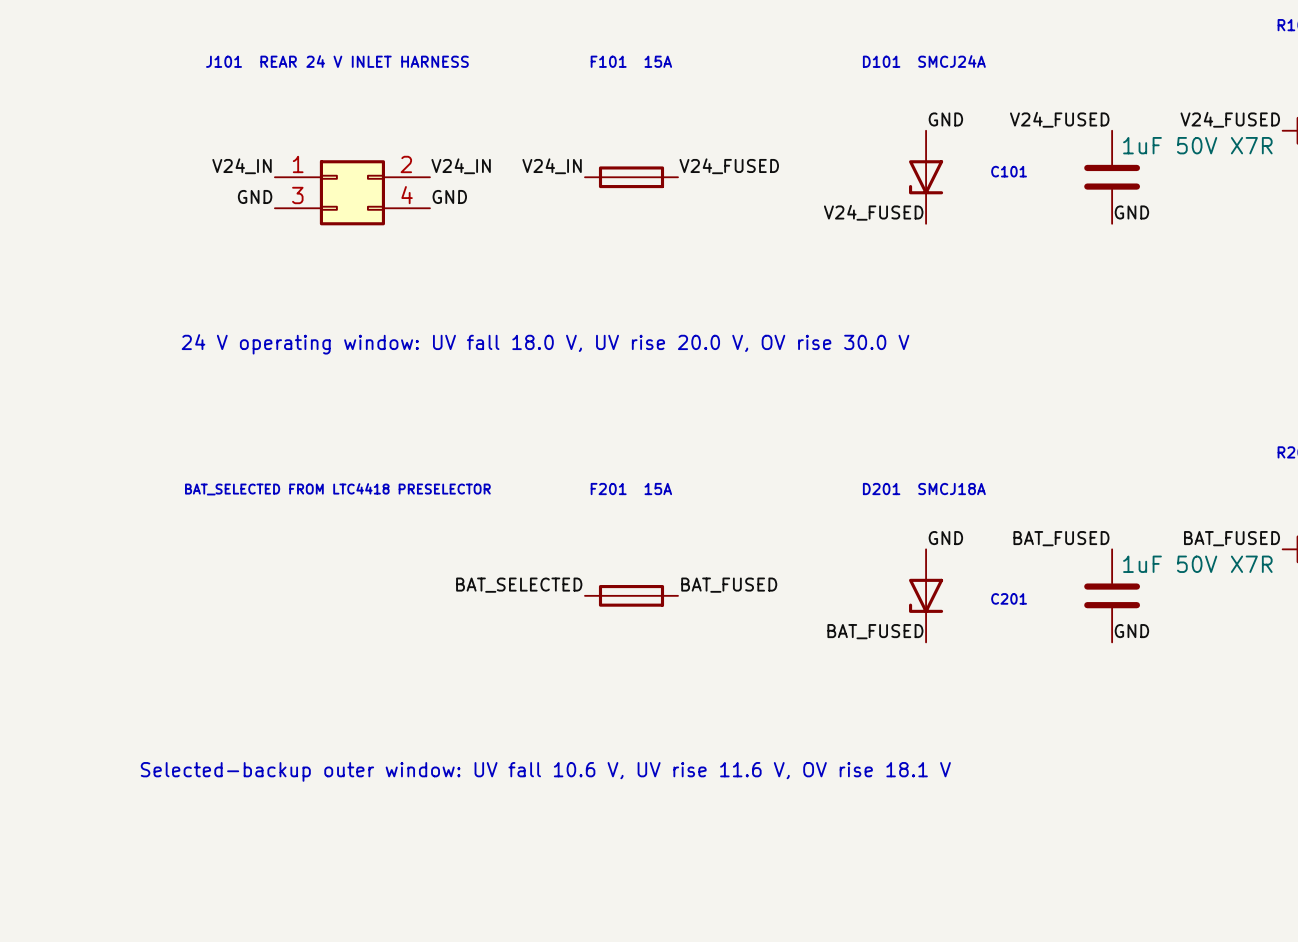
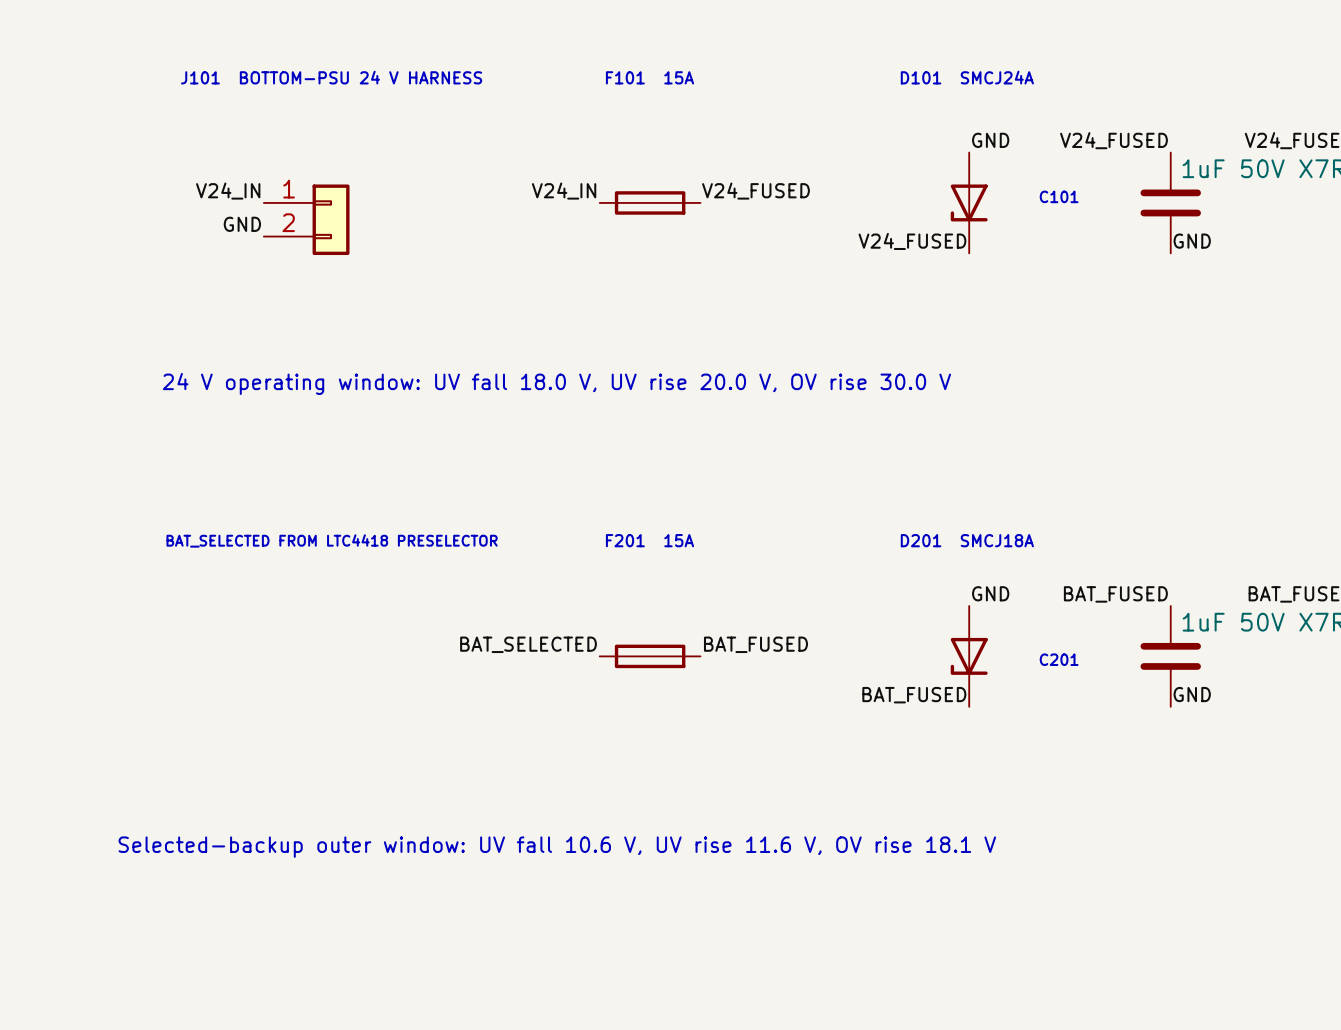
text: J101 REAR 24 V INLET HARNESS (337, 61) -> J101 BOTTOM-PSU 24 V HARNESS (331, 77)
label: V24_IN (461, 166) -> none
part: none -> (306, 219)
part: (352, 192) -> none
label: GND (449, 196) -> none

